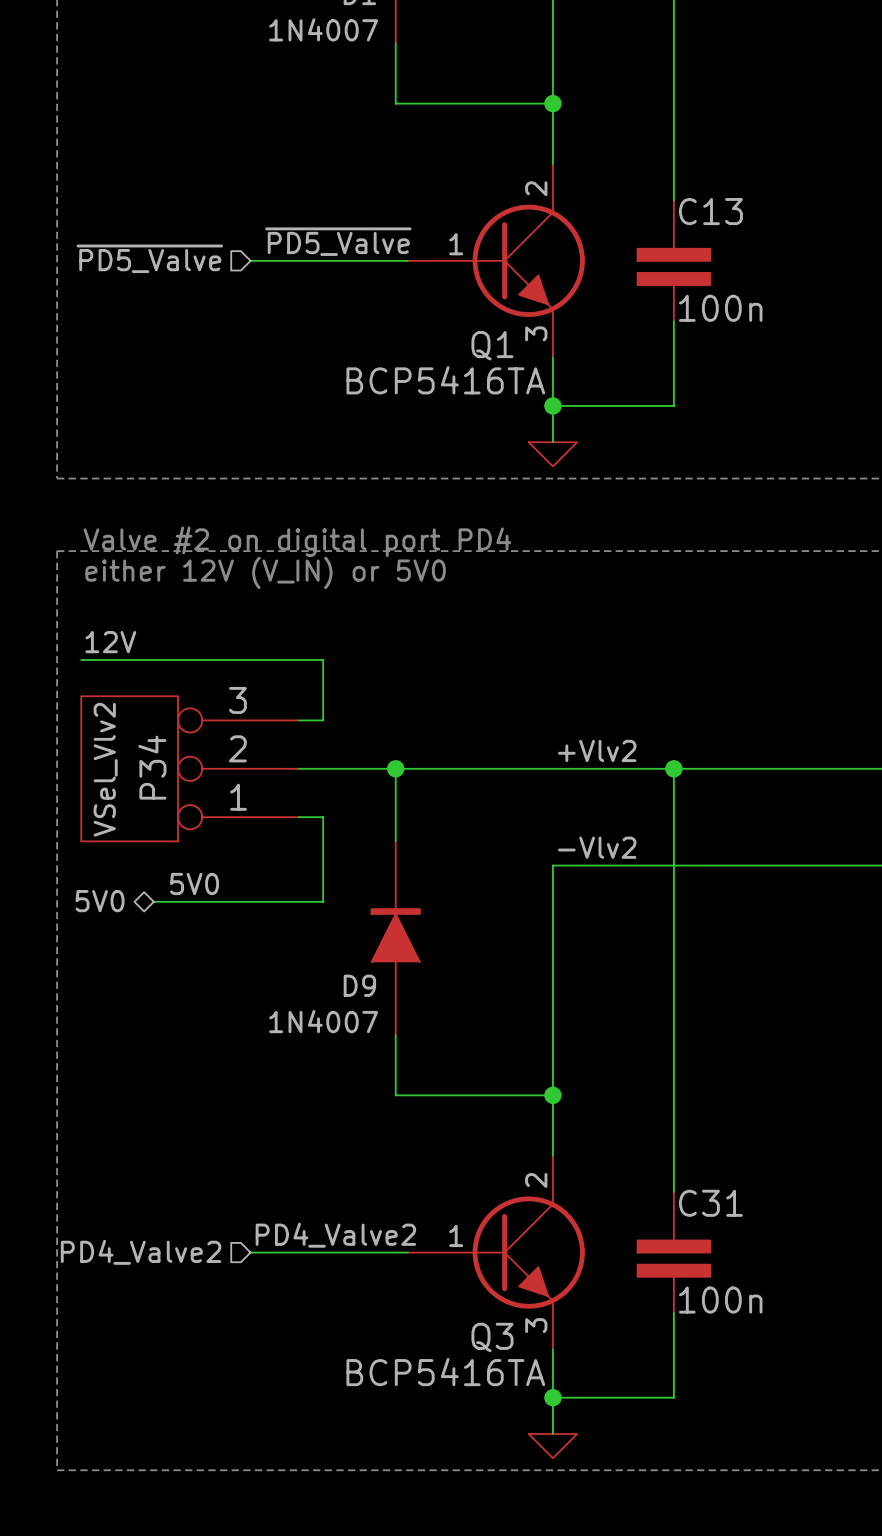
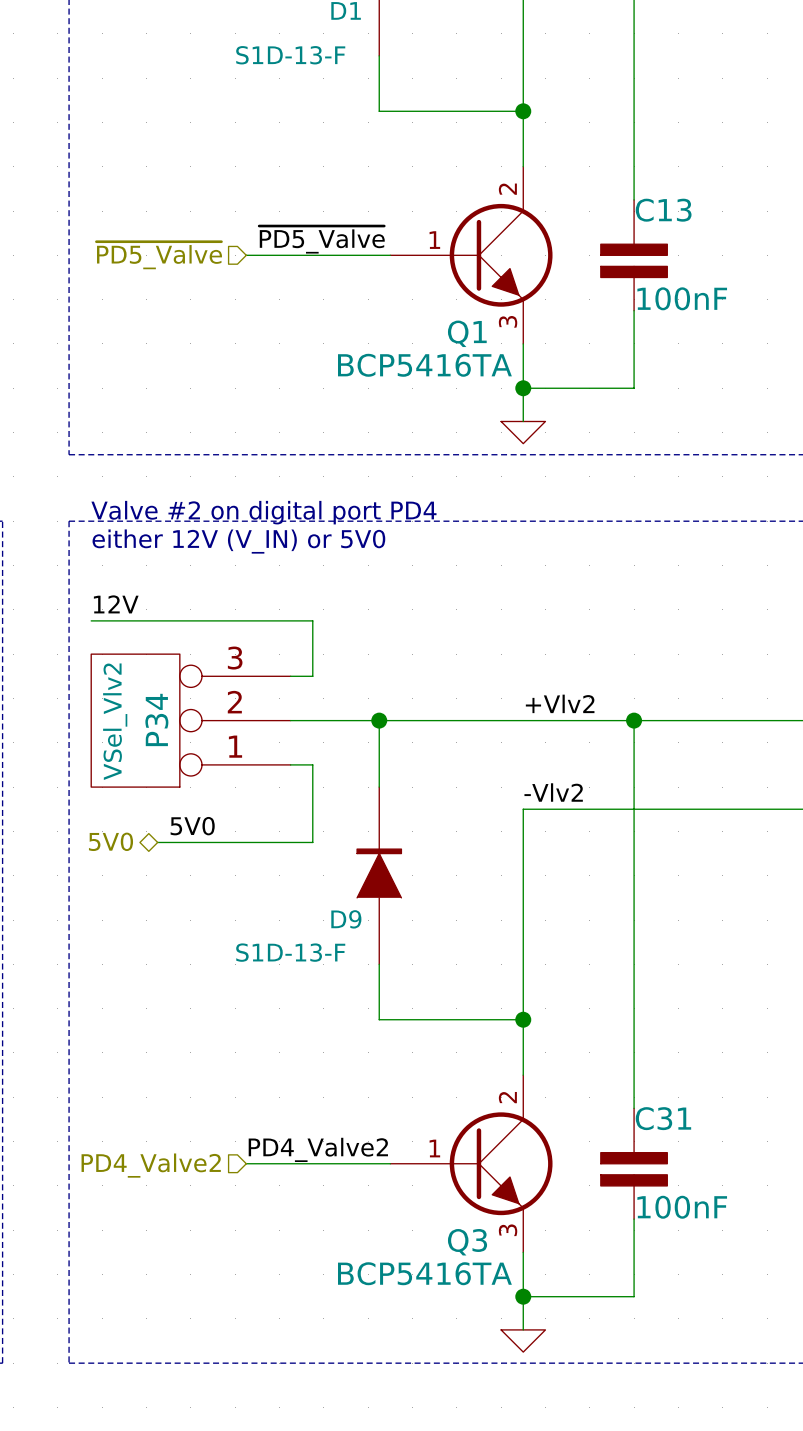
D1 value: 1N4007 (323, 29) -> S1D-13-F (290, 55)
C13 value: 100n (720, 308) -> 100nF (682, 298)
D9 value: 1N4007 (323, 1021) -> S1D-13-F (290, 952)
C31 value: 100n (720, 1300) -> 100nF (682, 1207)

